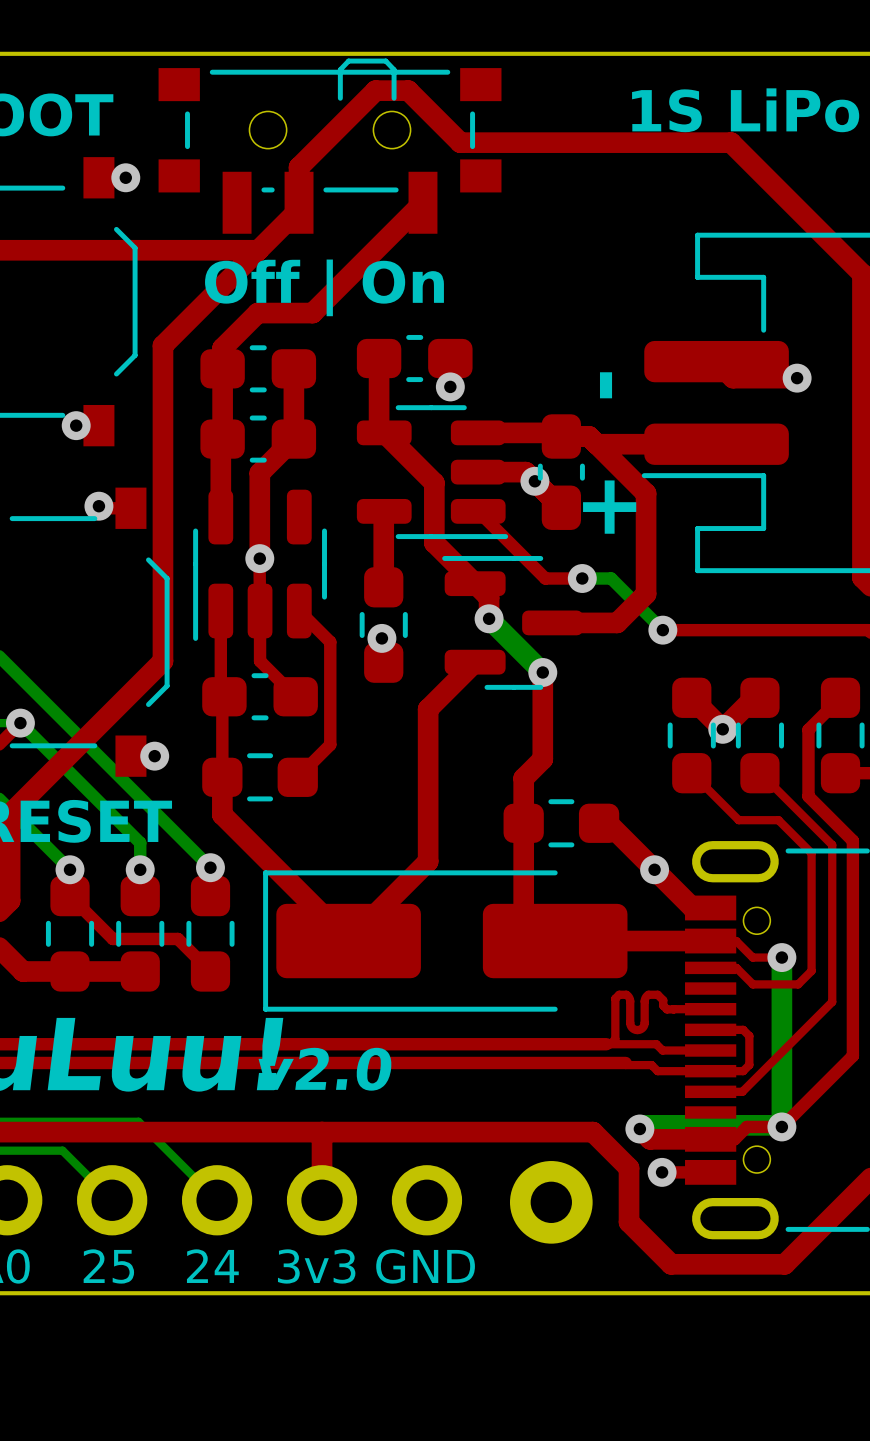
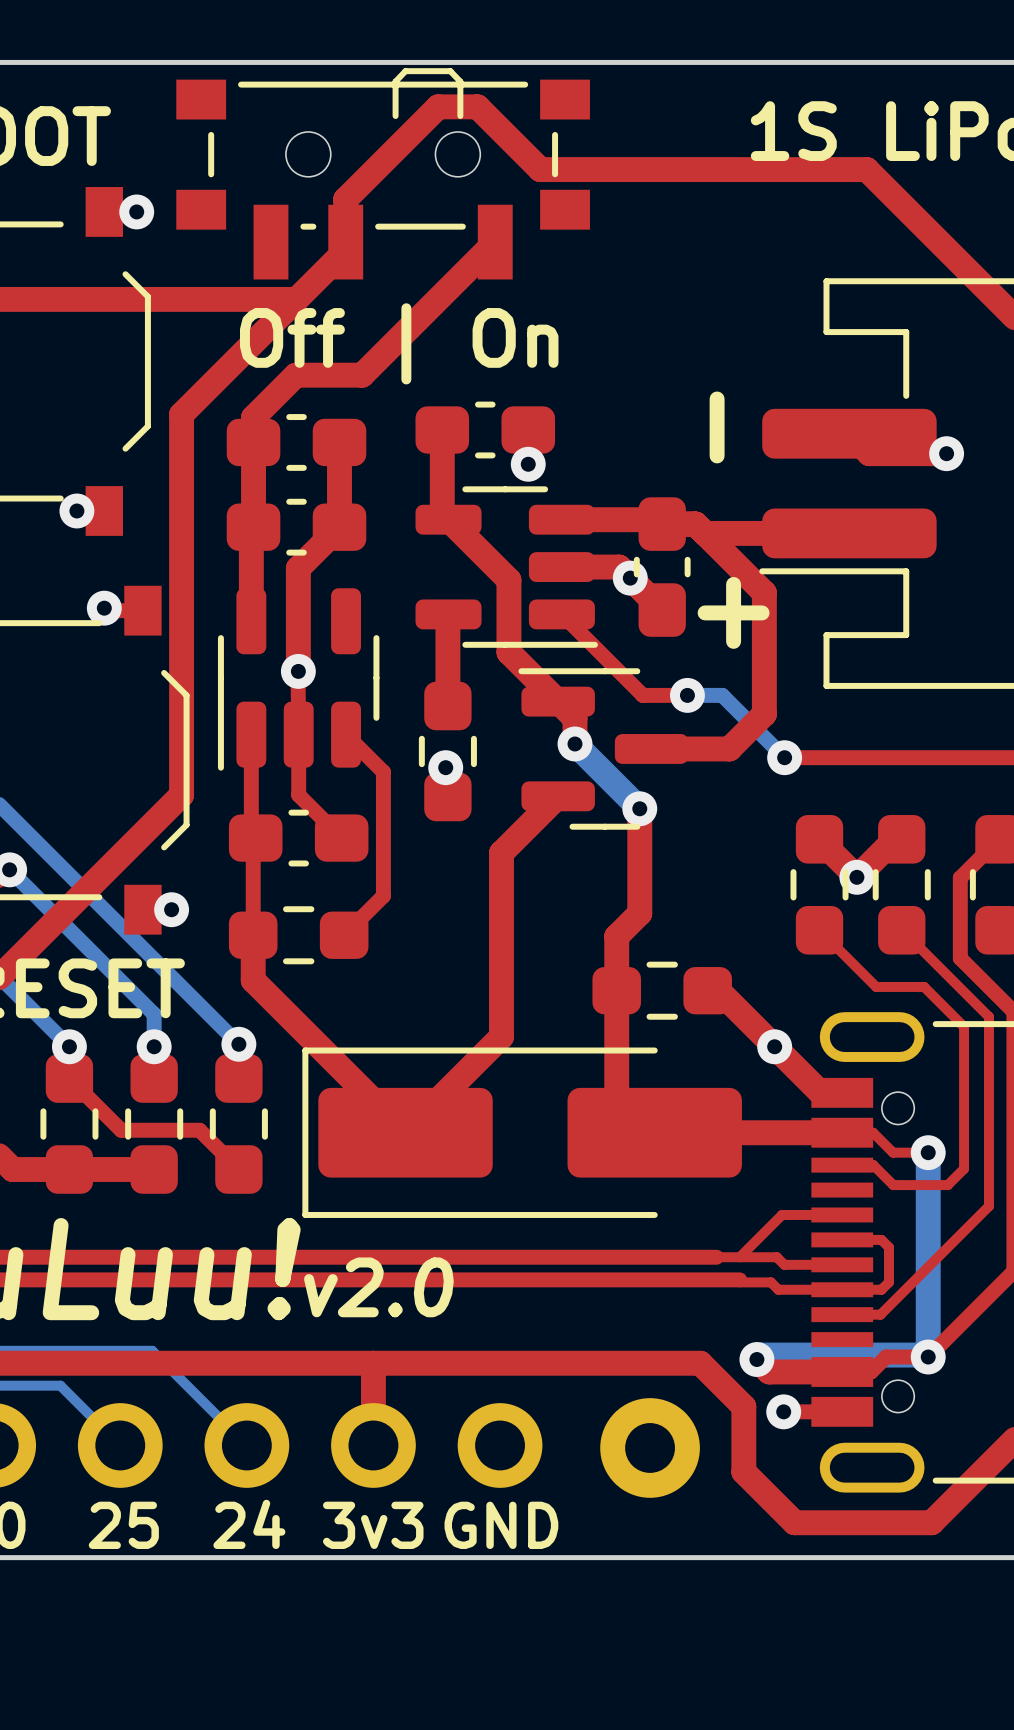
top track: (666, 1009) (663, 1005) (663, 1000) (657, 994) (648, 994) (644, 1000) (644, 1025) (640, 1029) (635, 1029) (630, 1024) (629, 998) (626, 994) (619, 994) (615, 998) (615, 1039) (610, 1044) -> (789, 1215) (782, 1214) (739, 1257)

